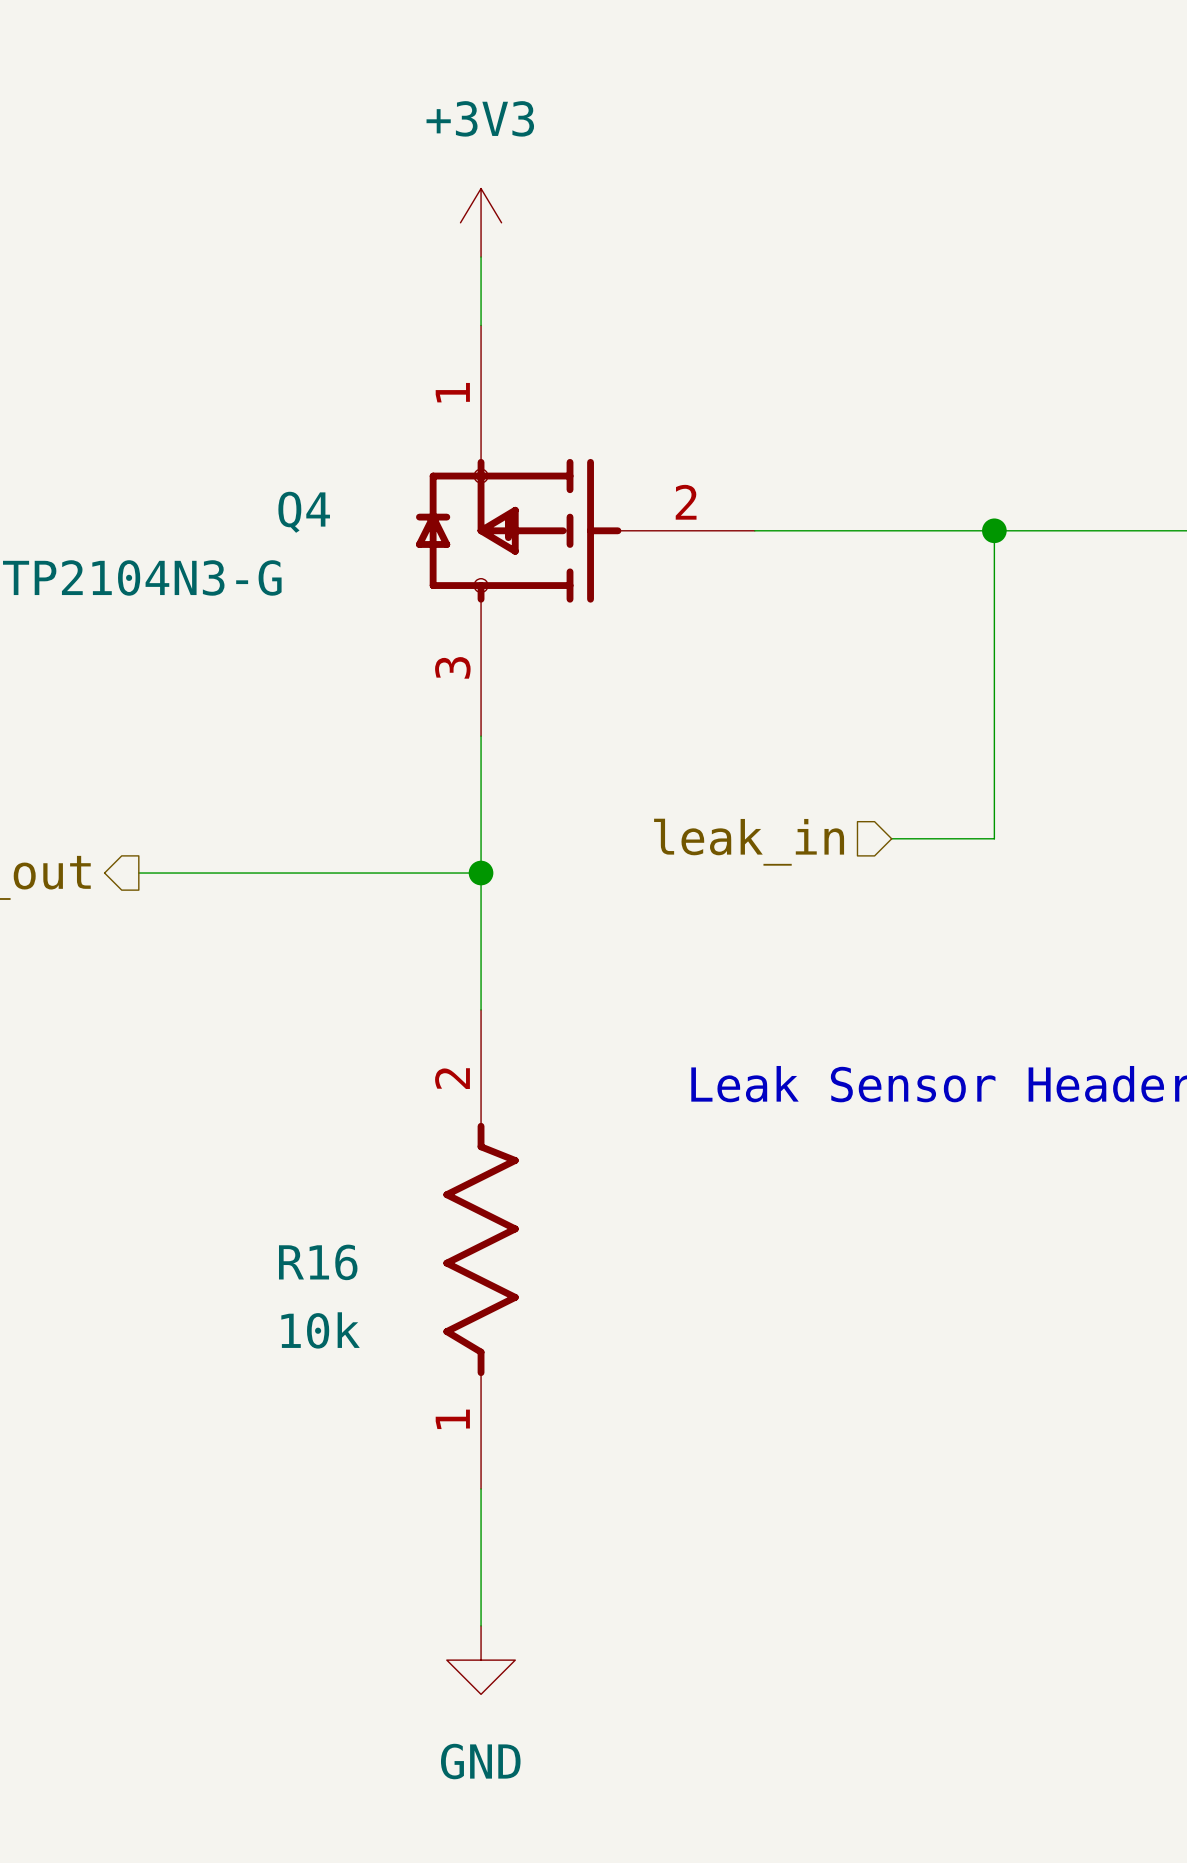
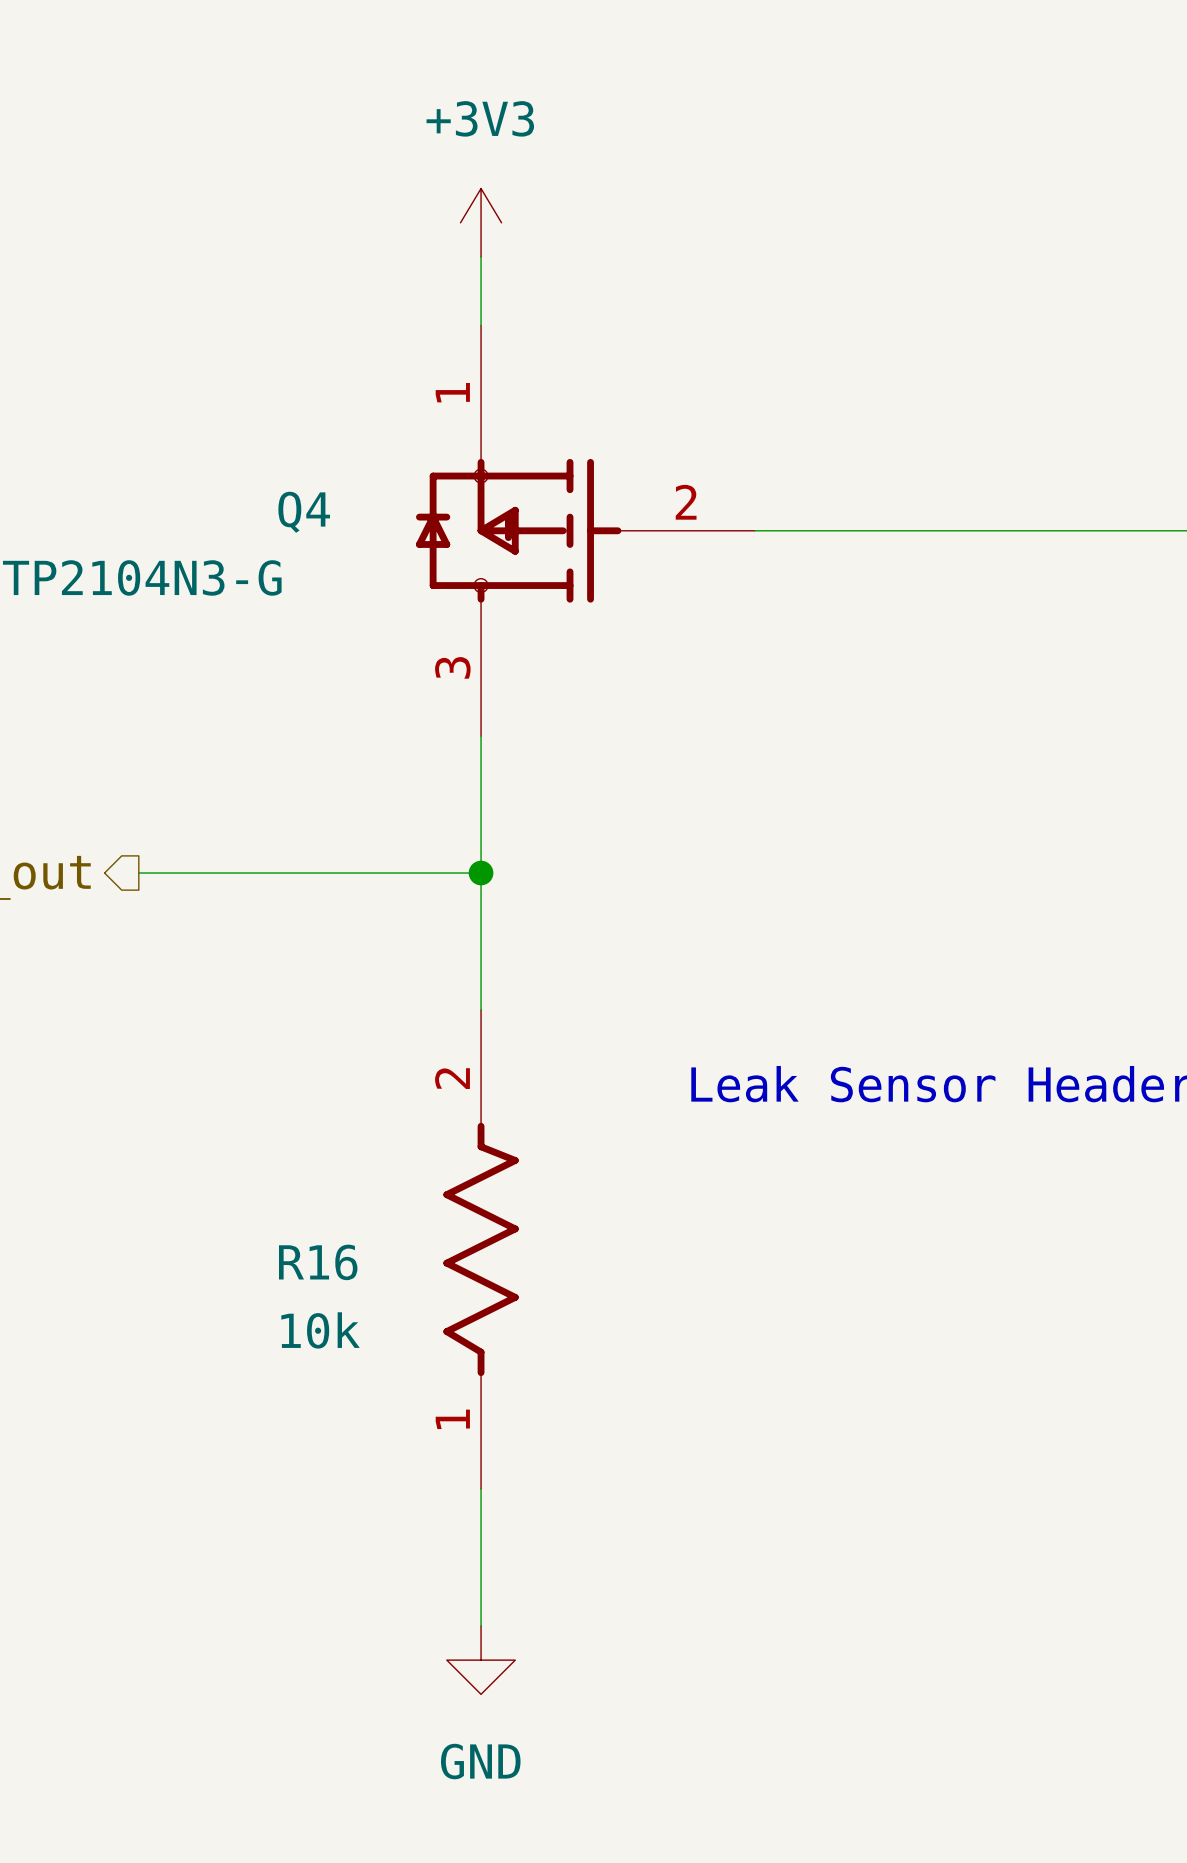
wire: (994, 530) (994, 838) (891, 838) -> none
junction: (994, 530) -> none
hierarchical label: leak_in (749, 842) -> none

